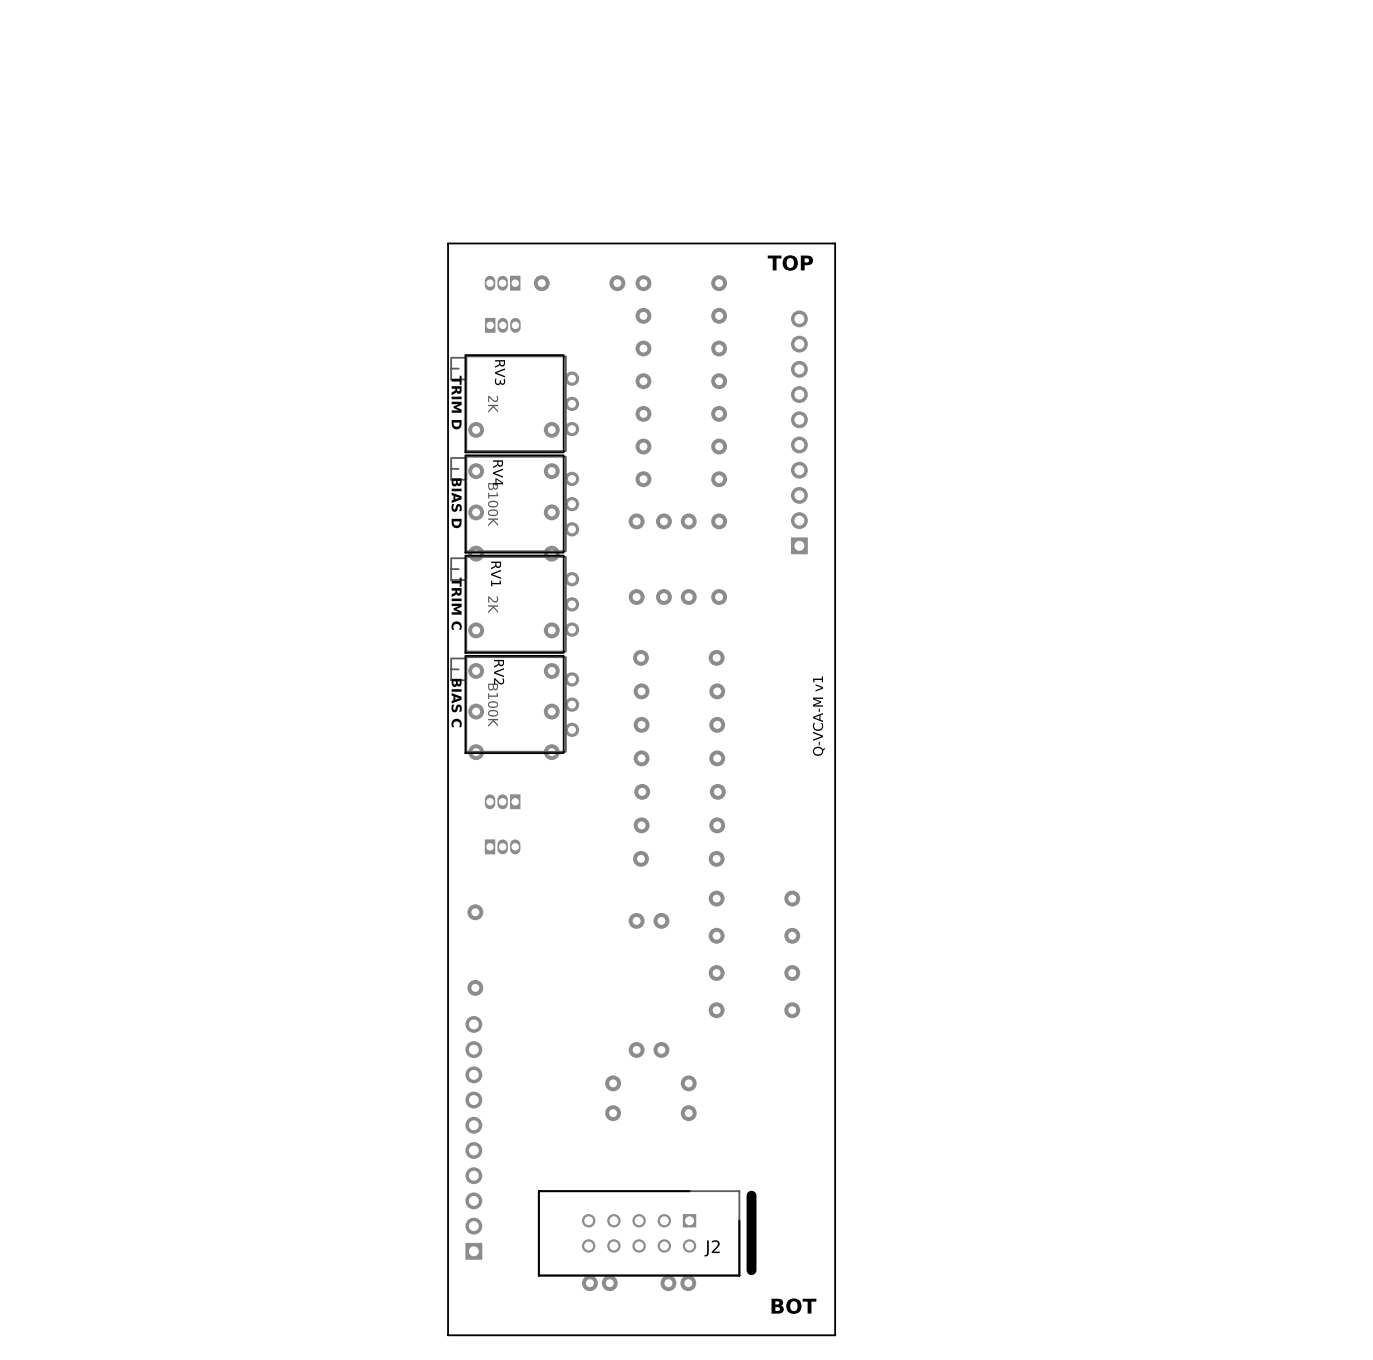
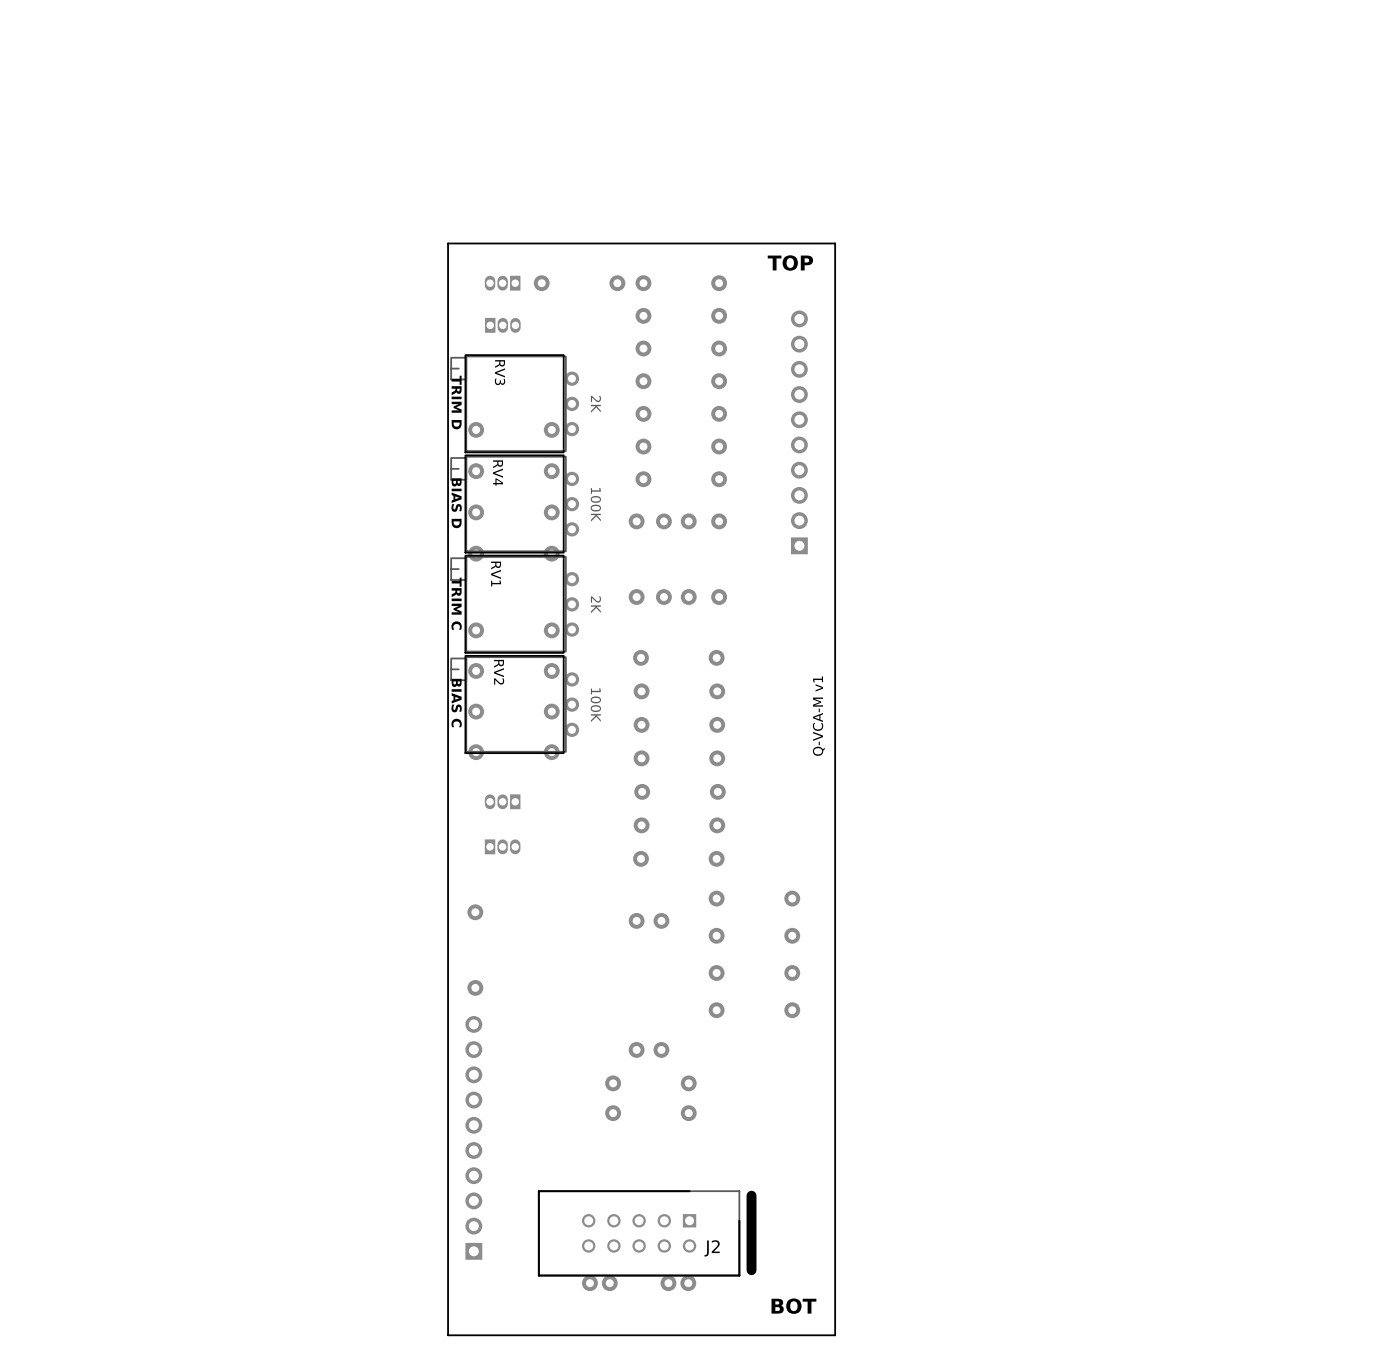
RV3 value position: 2K (493, 404) -> 2K (595, 404)
RV4 value: B100K (493, 504) -> 100K (595, 504)
RV1 value position: 2K (493, 604) -> 2K (595, 604)
RV2 value: B100K (493, 705) -> 100K (595, 705)

